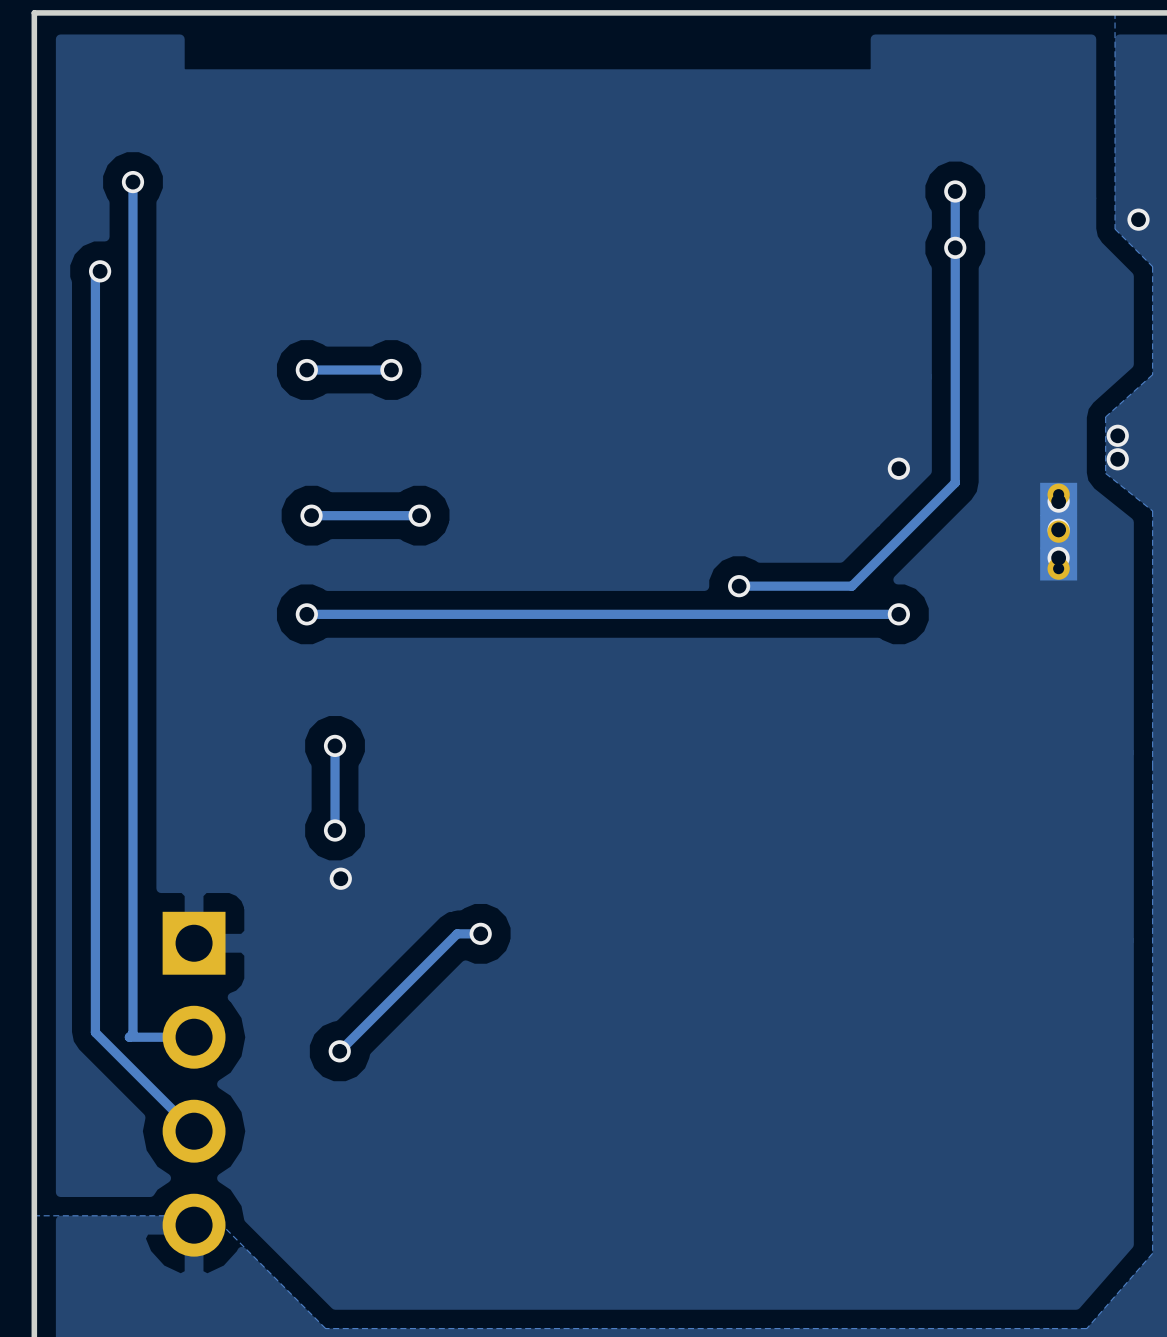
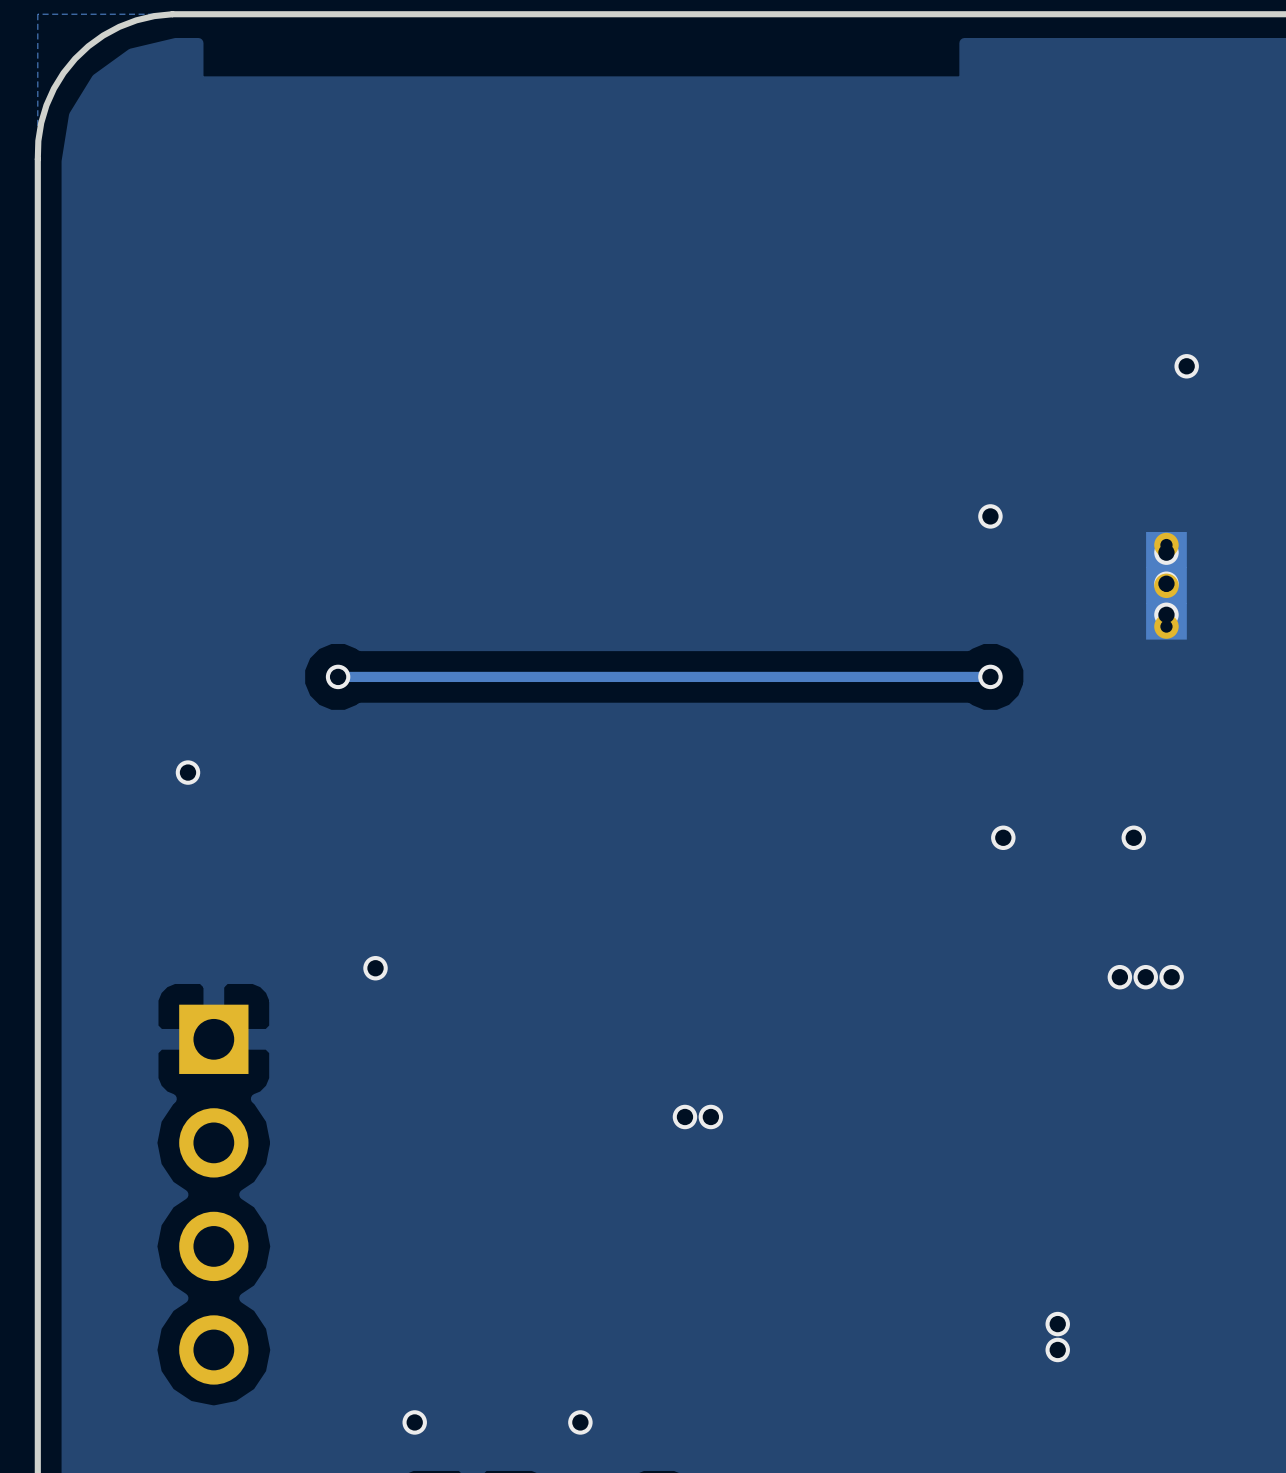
board edge: (156, 12) (34, 12) (34, 144) -> (172, 14) (154, 16) (119, 26) (103, 35) (75, 58) (53, 88) (46, 105) (38, 140) (37, 159)
zone outline: (1115, 12) (1115, 229) (1152, 266) (1152, 374) (1105, 417) (1105, 473) (1152, 510) (1152, 1253) (1086, 1328) (325, 1328) (212, 1215) (34, 1215) -> none
track: (132, 182) (132, 1033) (129, 1037) (194, 1037) -> none
via: (132, 182) -> none
track: (955, 191) (955, 482) (851, 586) (739, 586) -> none
via: (955, 191) -> none
via: (1138, 219) -> none
via: (955, 247) -> none
track: (100, 271) (95, 276) (95, 1032) (194, 1131) (175, 1131) -> none
via: (100, 271) -> none
via: none -> (1186, 366)
via: (306, 370) -> none
track: (391, 370) (306, 370) -> none
via: (391, 370) -> none
via: (1117, 435) -> none
via: (1117, 459) -> none
via: (311, 515) -> none
track: (419, 515) (311, 515) -> none
via: (419, 515) -> none
via: (739, 586) -> none
via: none -> (187, 772)
track: (335, 745) (335, 830) -> none
via: (335, 745) -> none
via: none -> (1003, 837)
via: none -> (1133, 837)
via: (335, 830) -> none
via: none -> (1119, 977)
via: none -> (1145, 977)
via: none -> (1171, 977)
track: (480, 933) (457, 933) (339, 1051) -> none
via: (480, 933) -> none
via: none -> (684, 1116)
via: none -> (710, 1116)
via: (339, 1051) -> none
via: none -> (1057, 1324)
via: none -> (1057, 1349)
via: none -> (414, 1422)
via: none -> (580, 1422)

